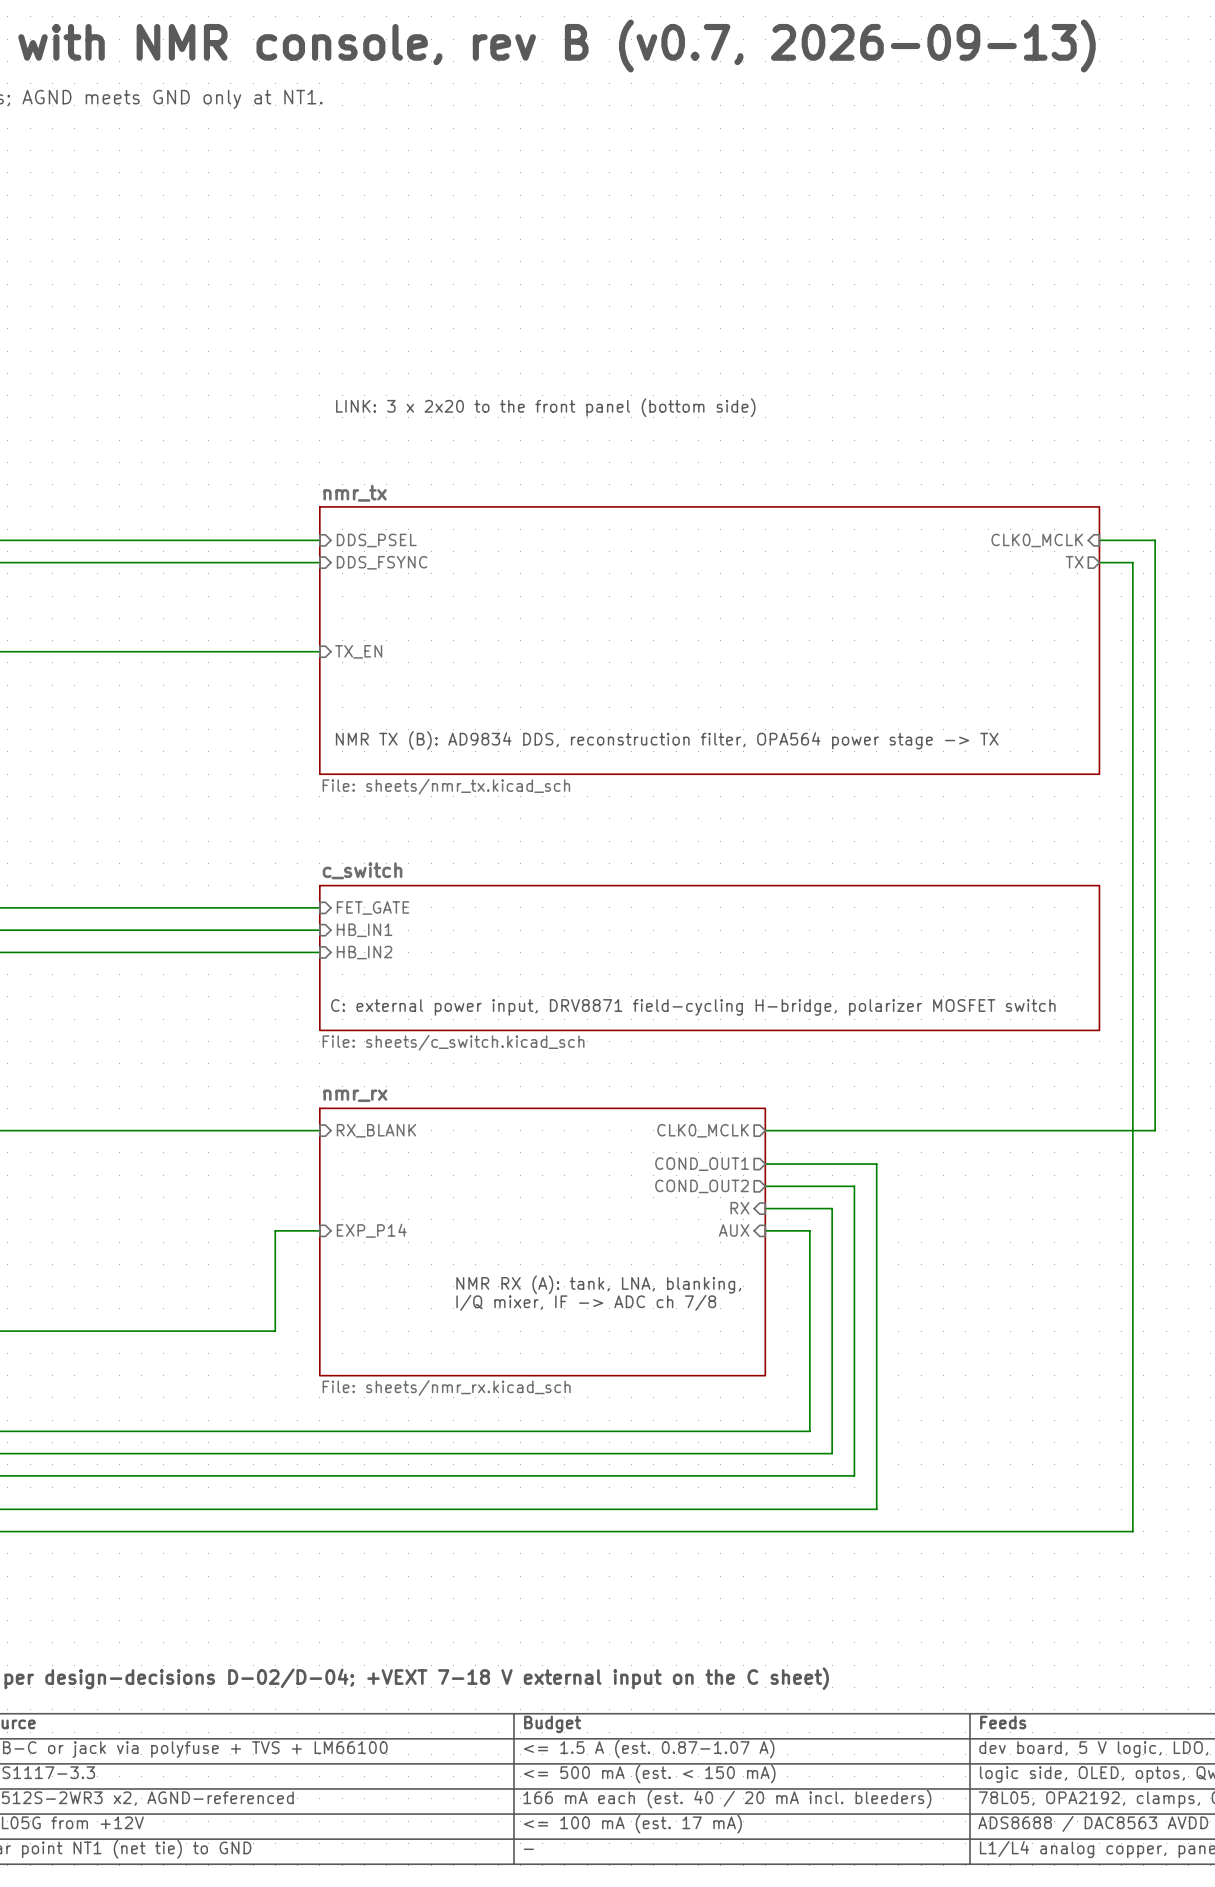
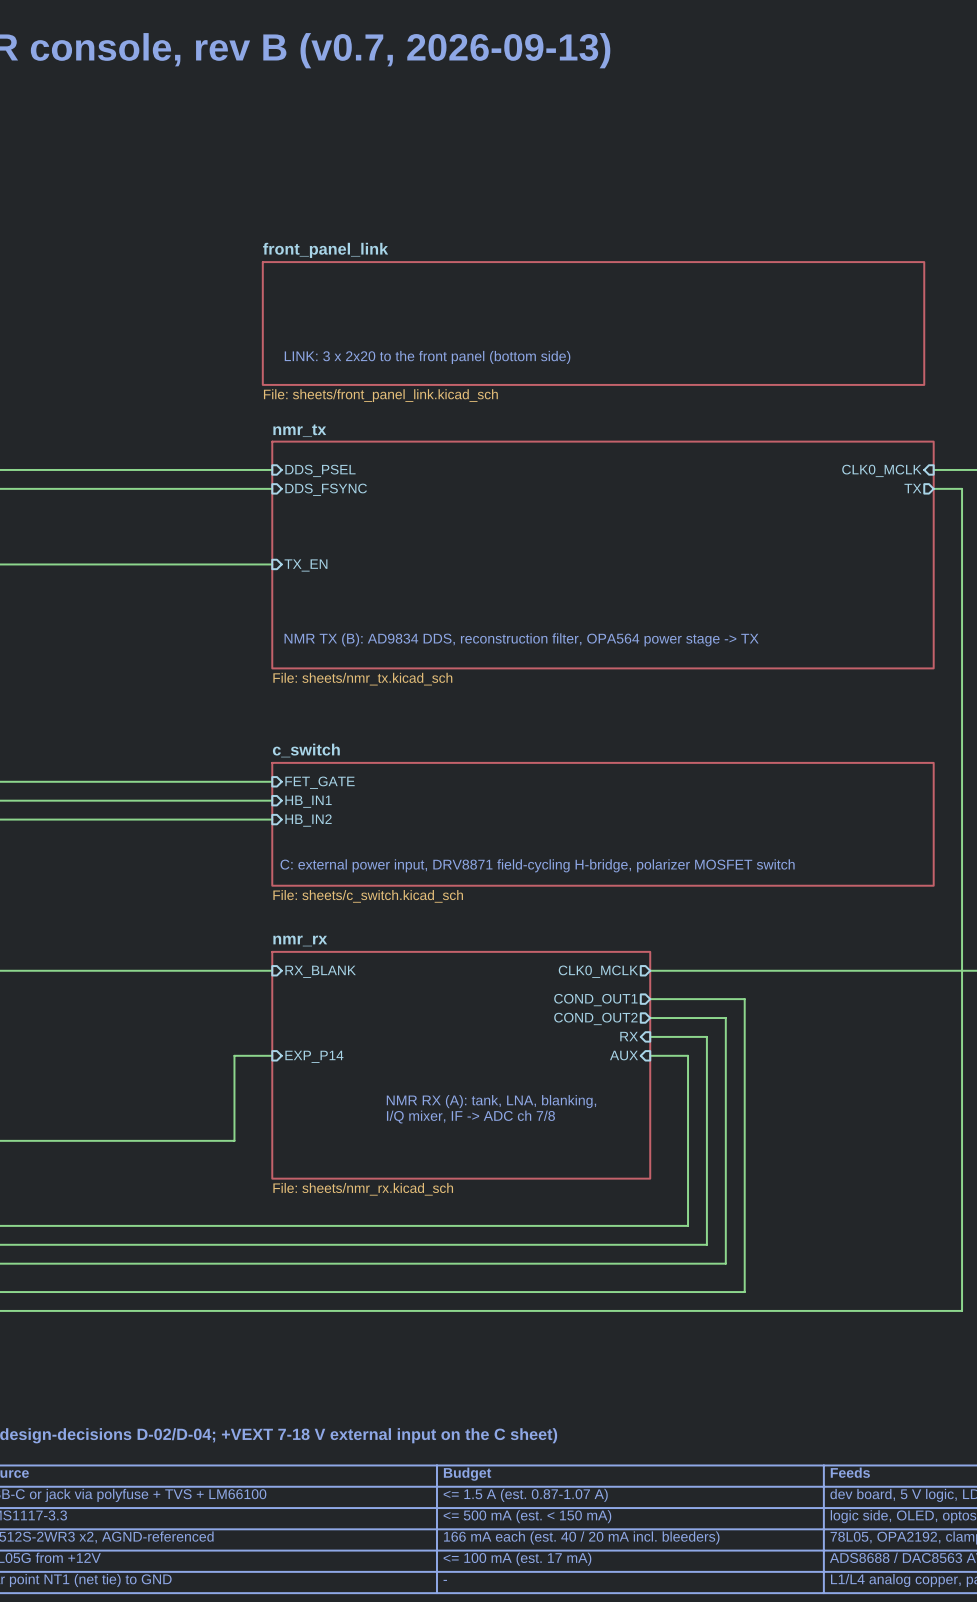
sheet front_panel_link: none -> File: sheets/front_panel_link.kicad_sch (593, 323)

